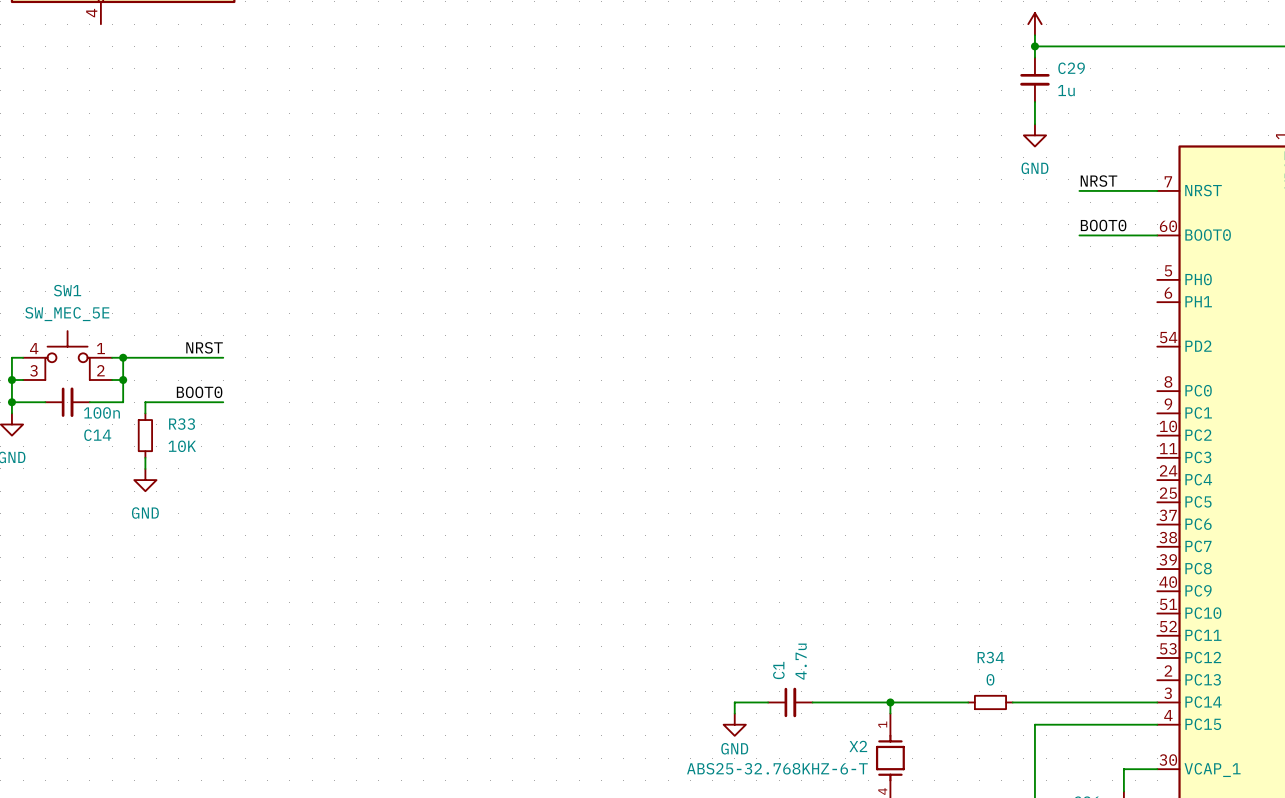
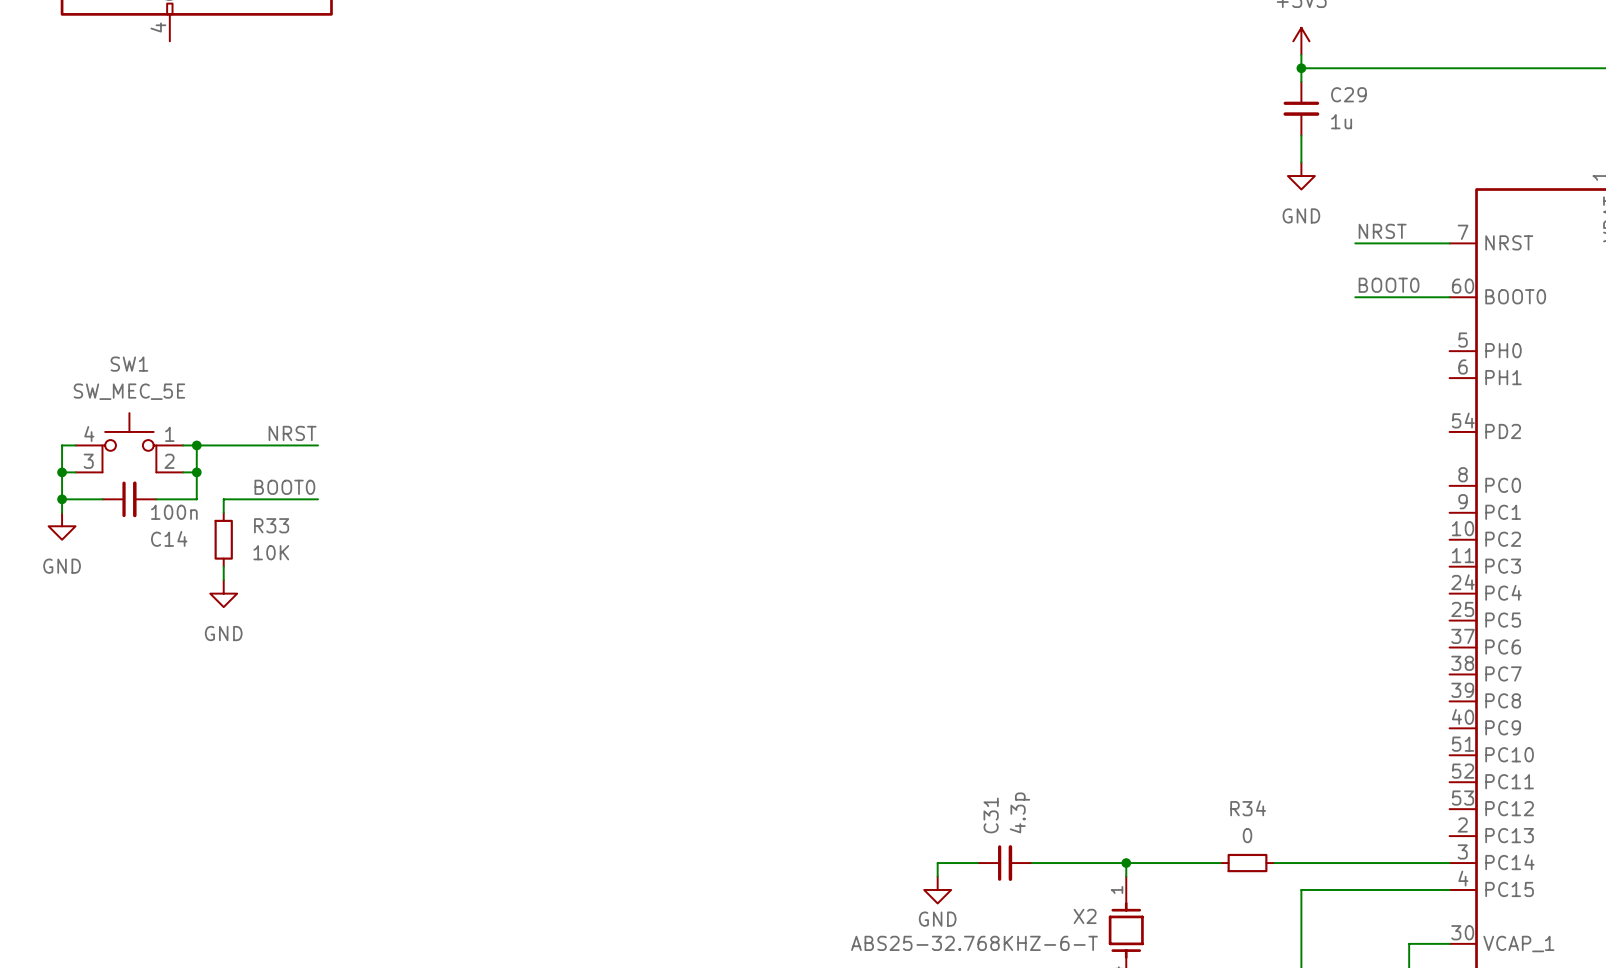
C1 value: 4.7u (801, 661) -> 4.3p (1019, 812)
C1 name: C1 (778, 670) -> C31 (991, 815)

